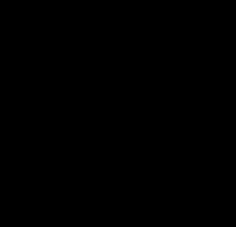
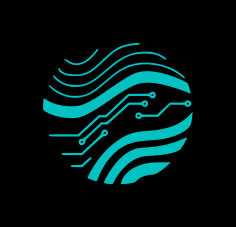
drawing: none -> [42, 42, 193, 185]

